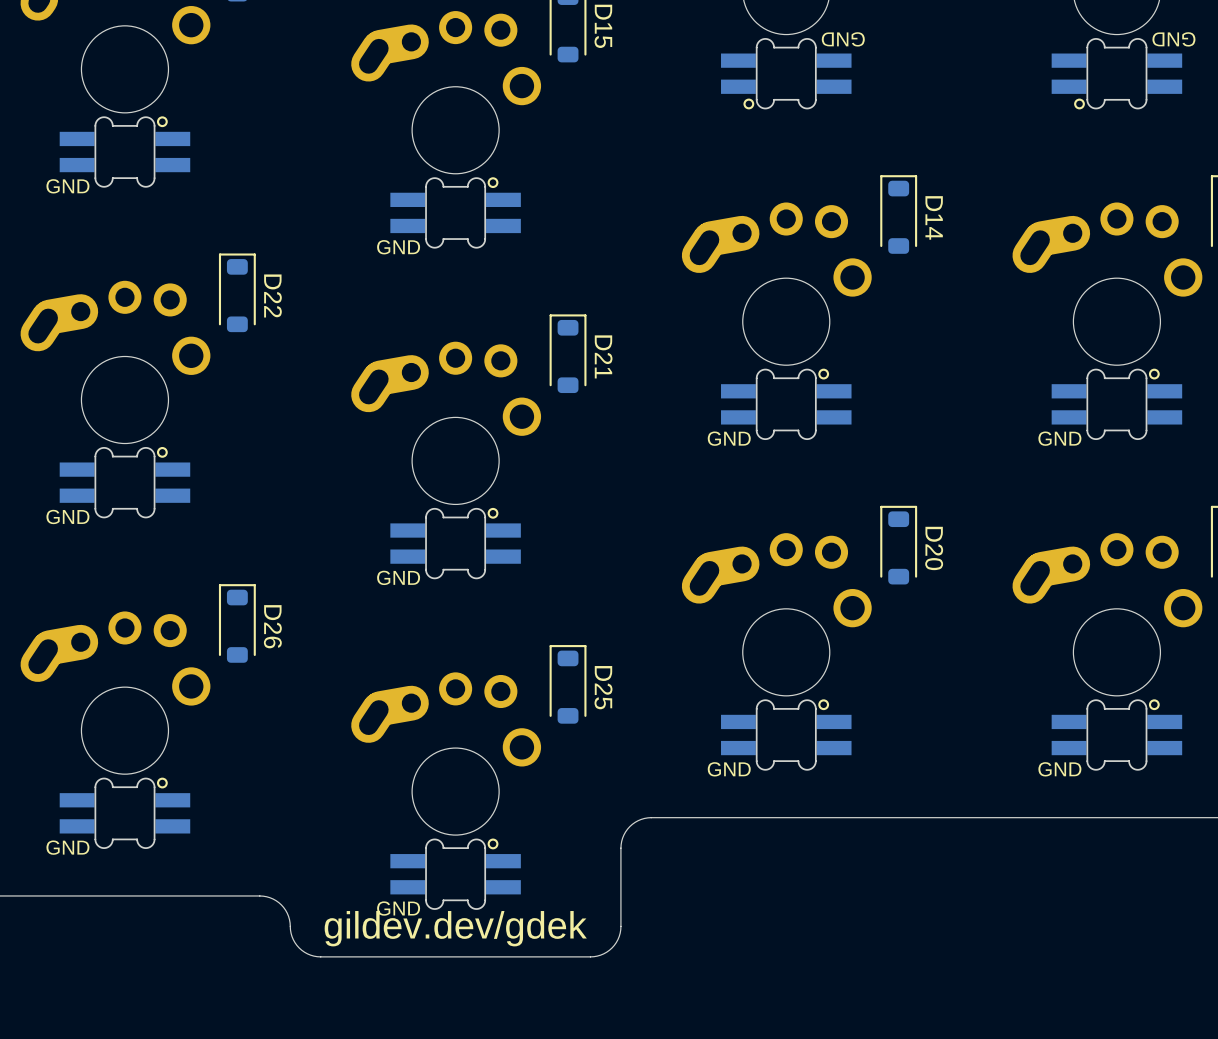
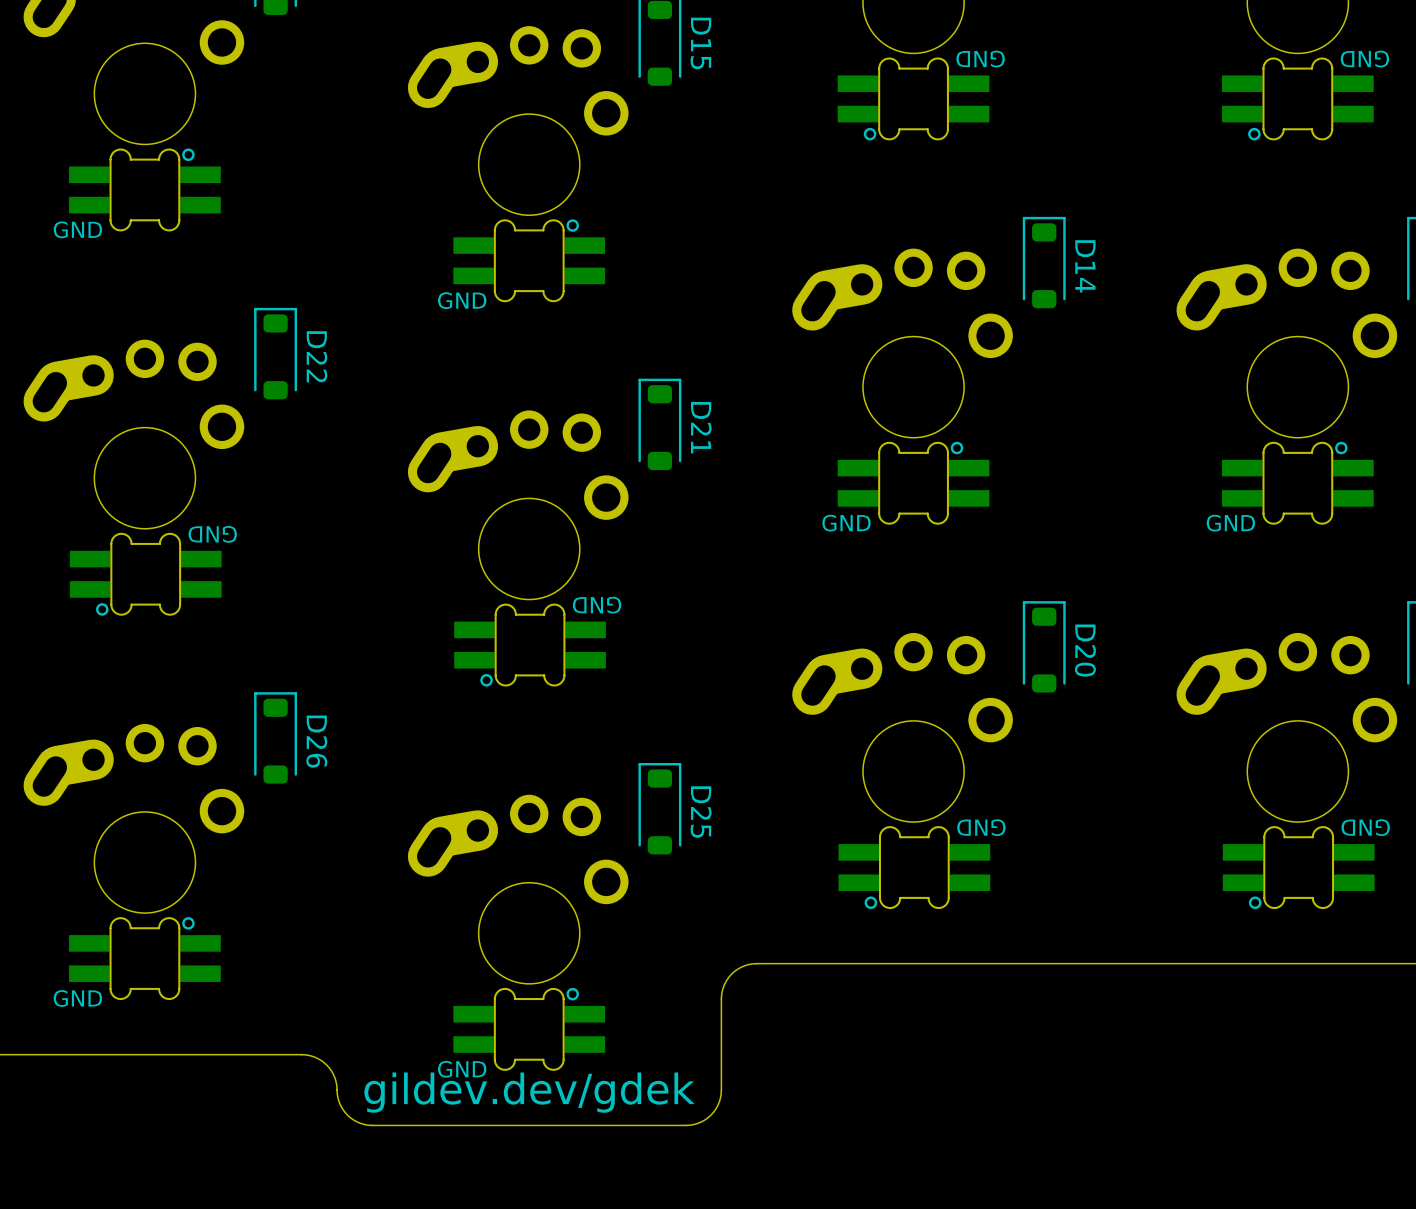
part rotation: 0° (124, 482) -> 180° (145, 574)
part rotation: 0° (455, 543) -> 180° (530, 645)
part rotation: 0° (786, 735) -> 180° (914, 867)
part rotation: 0° (1116, 735) -> 180° (1298, 867)

